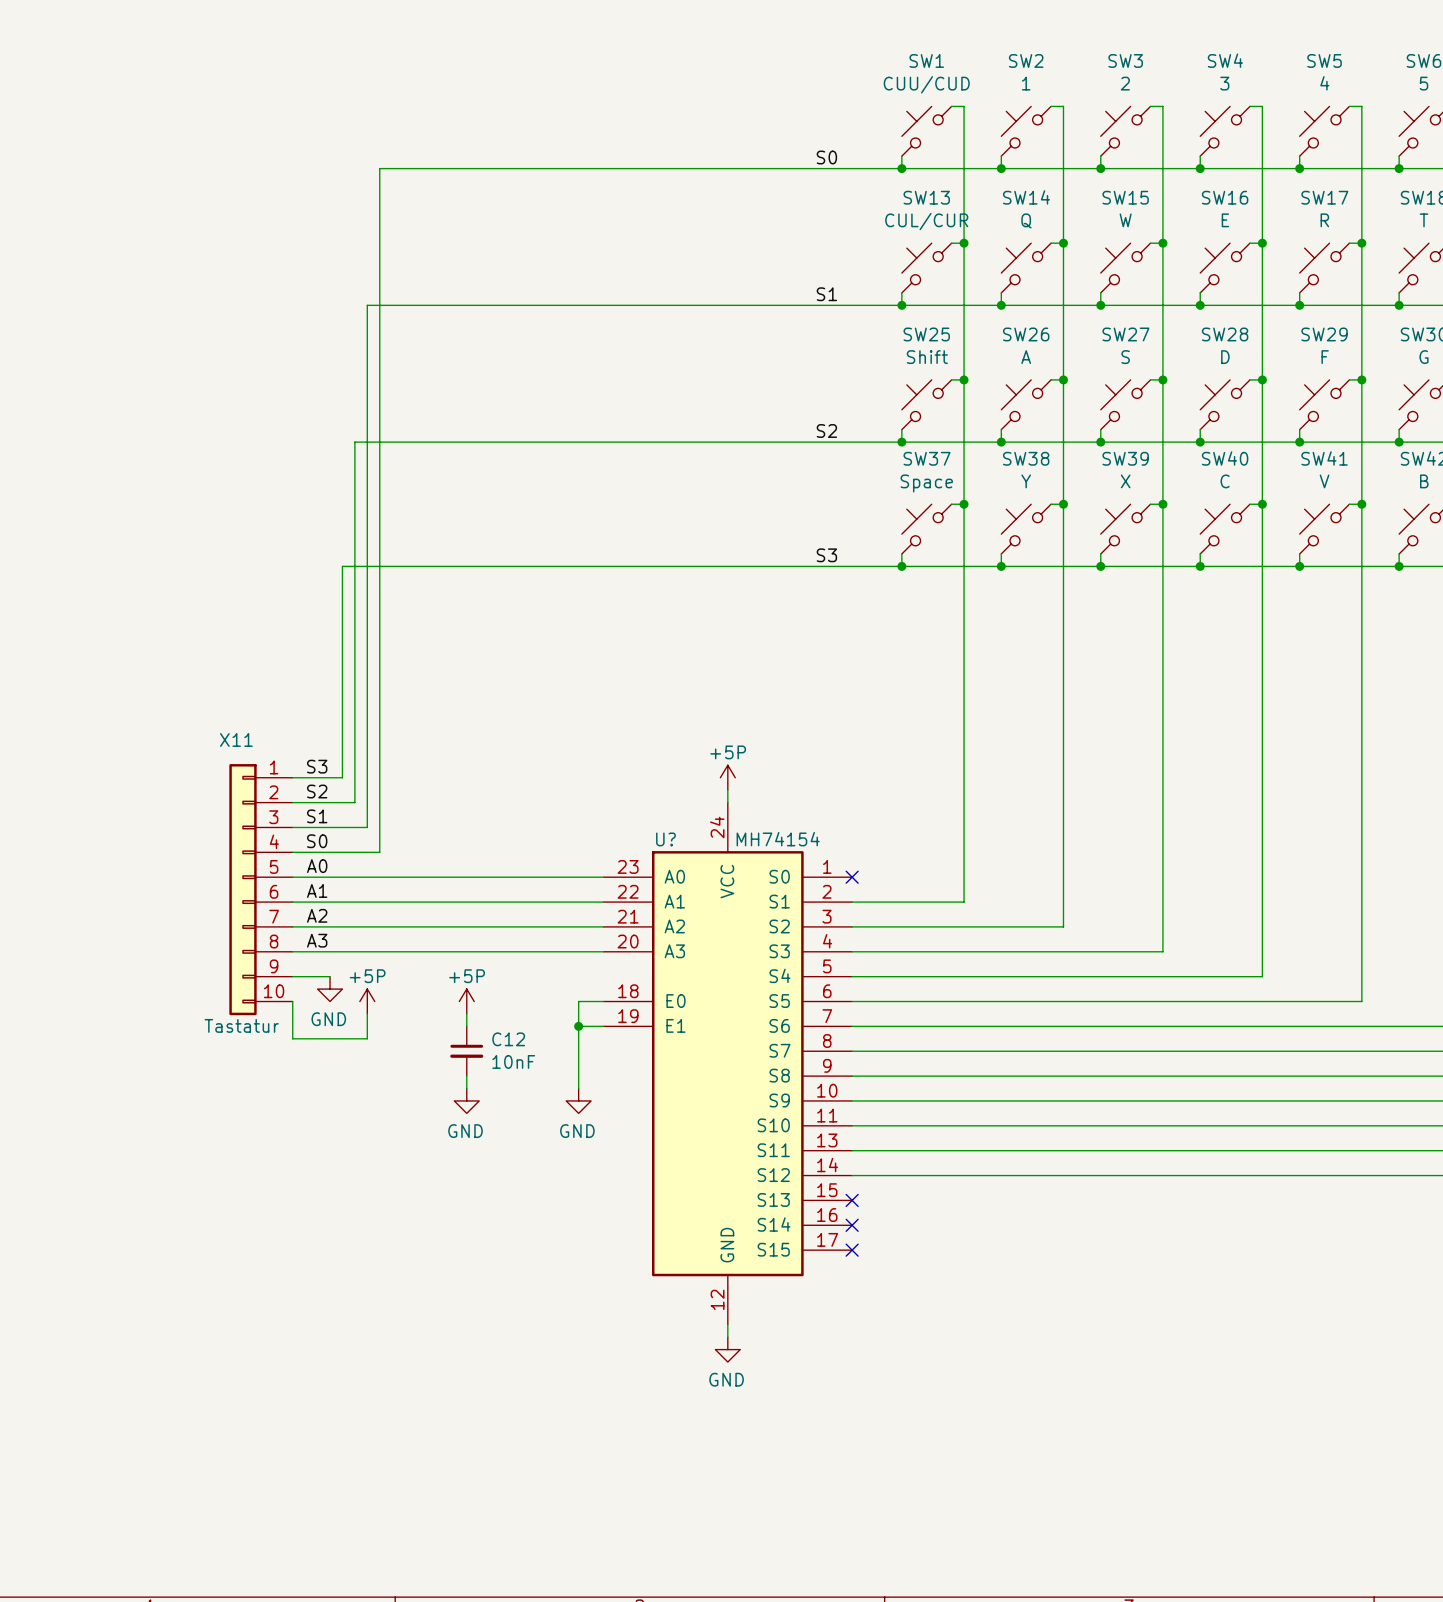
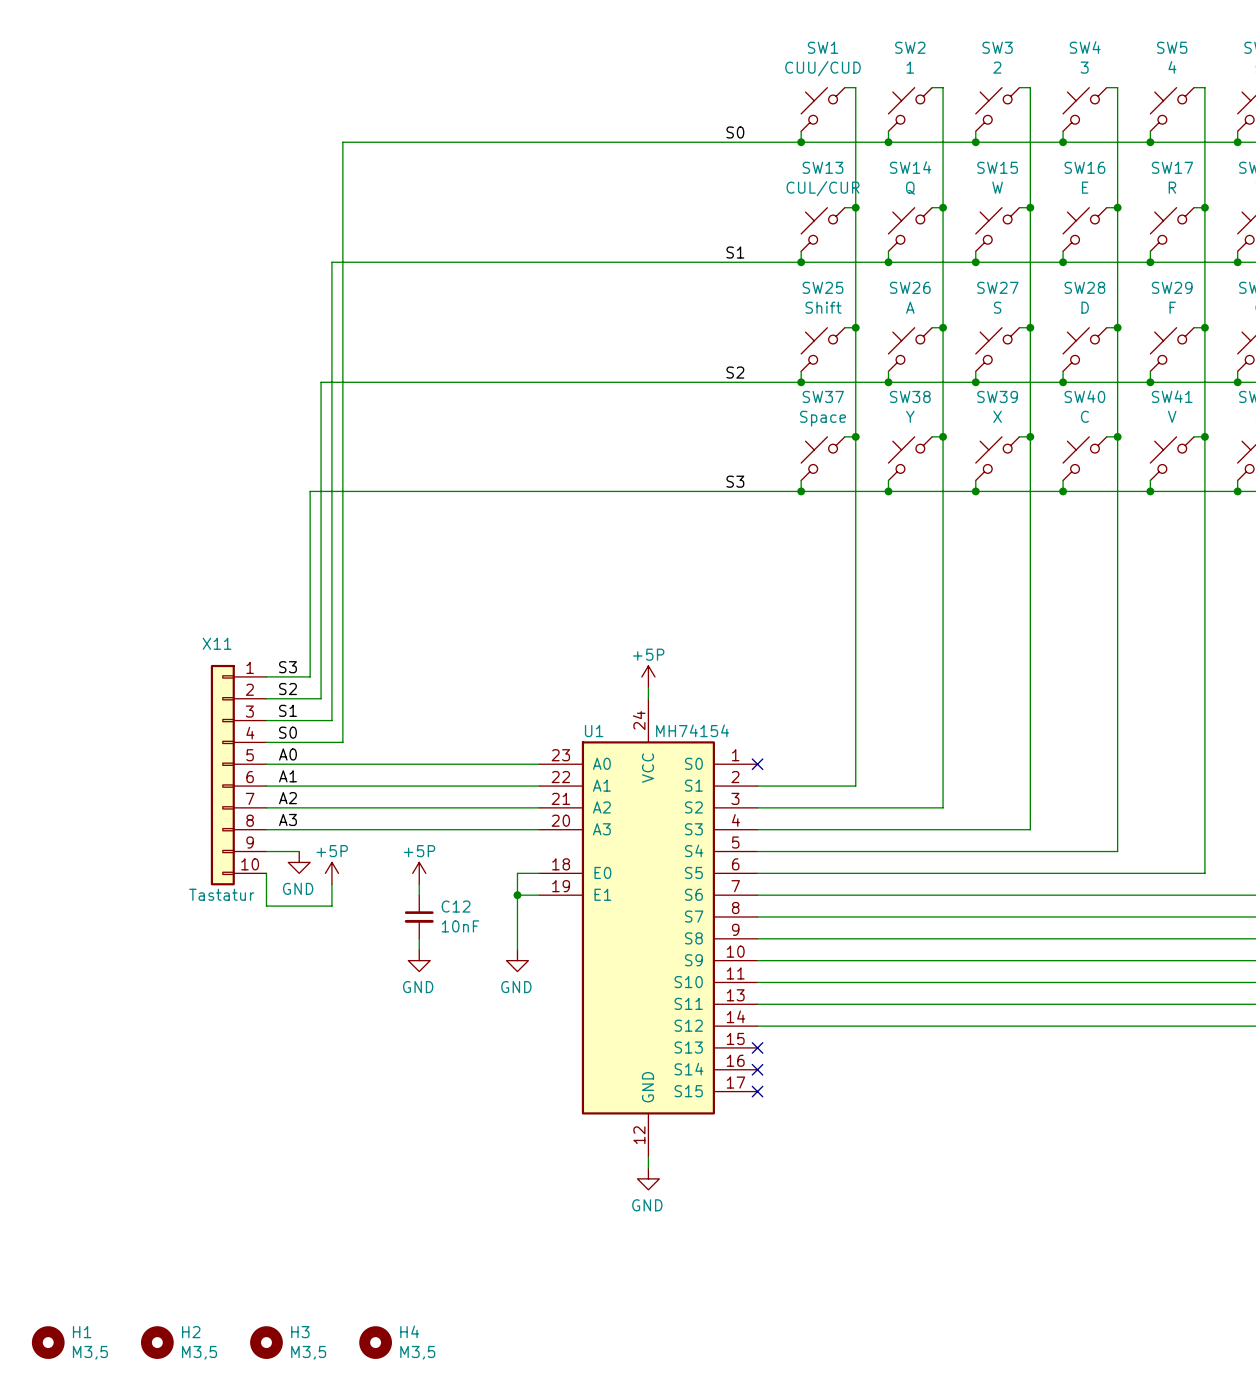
U? name: U? (665, 839) -> U1 (594, 731)
H1: none -> M3,5 (48, 1342)
H2: none -> M3,5 (157, 1342)
H3: none -> M3,5 (266, 1342)
H4: none -> M3,5 (375, 1342)

